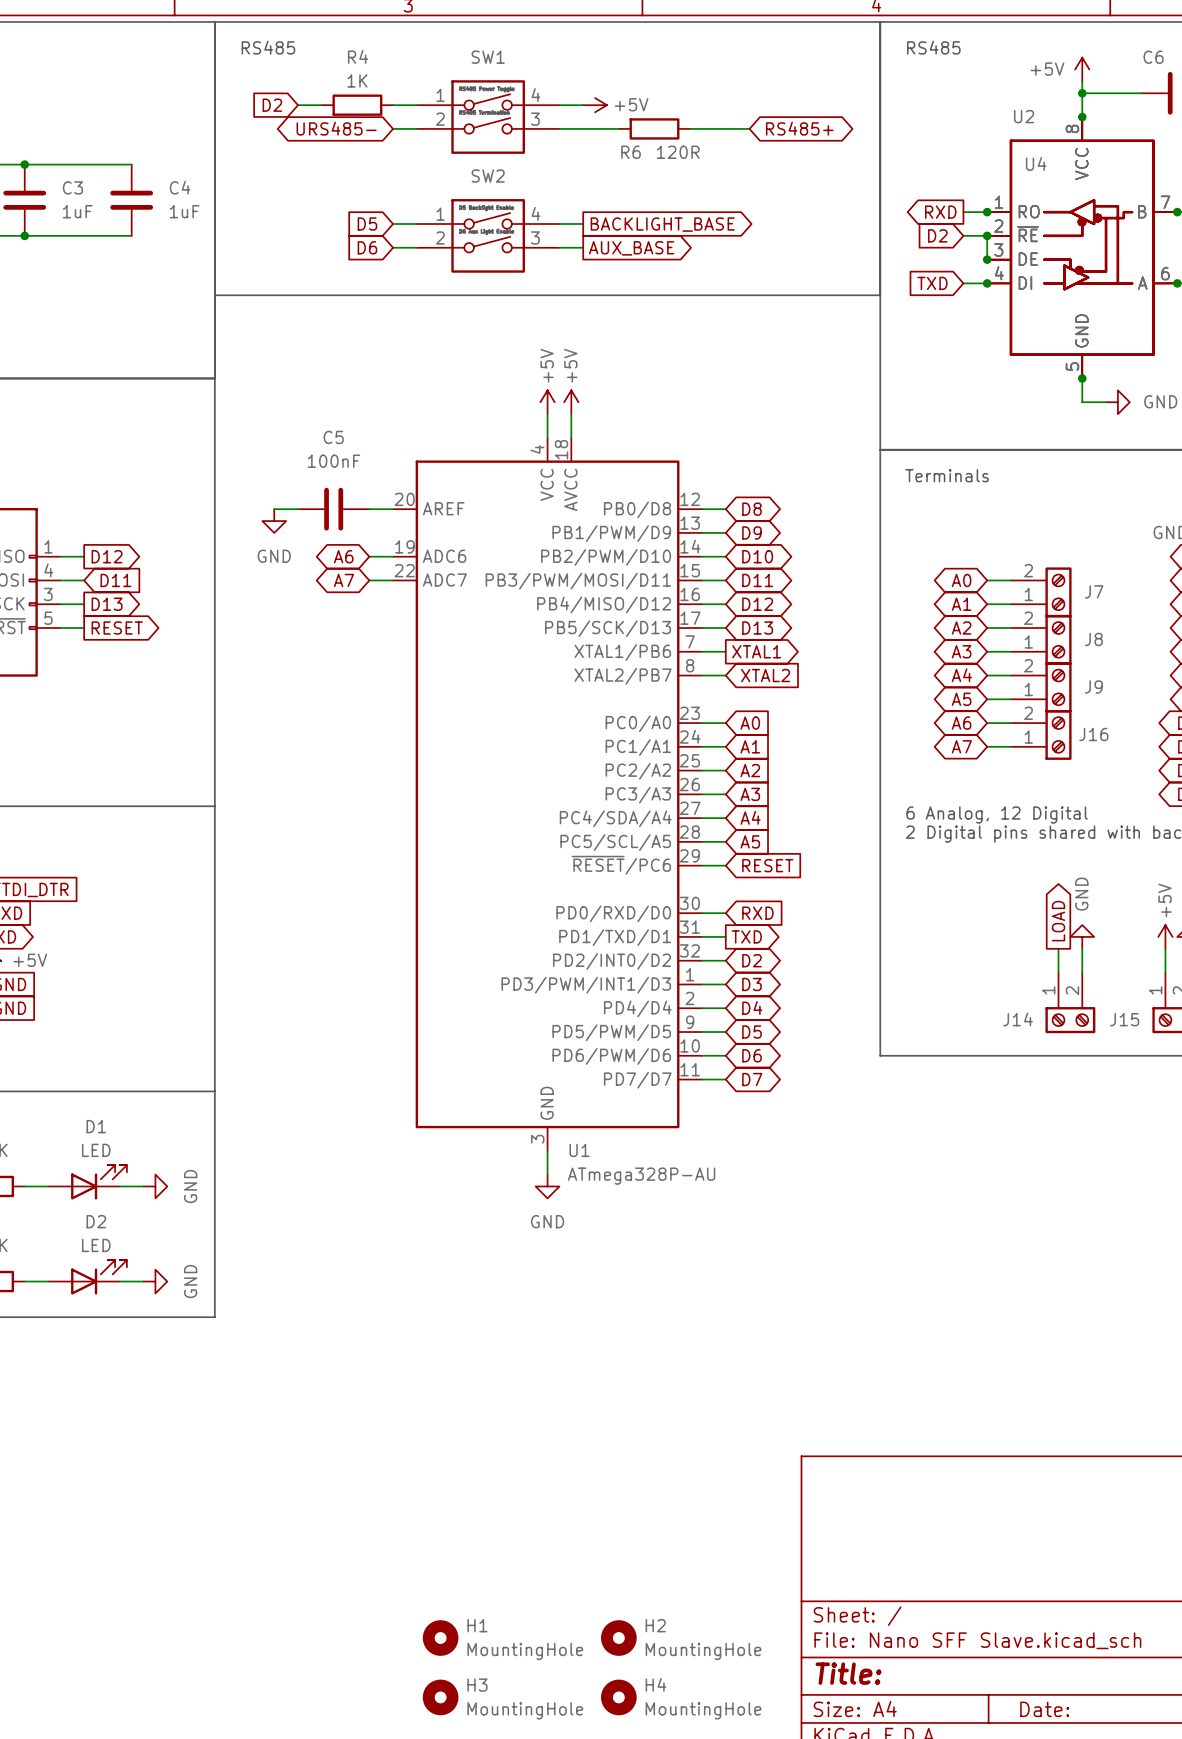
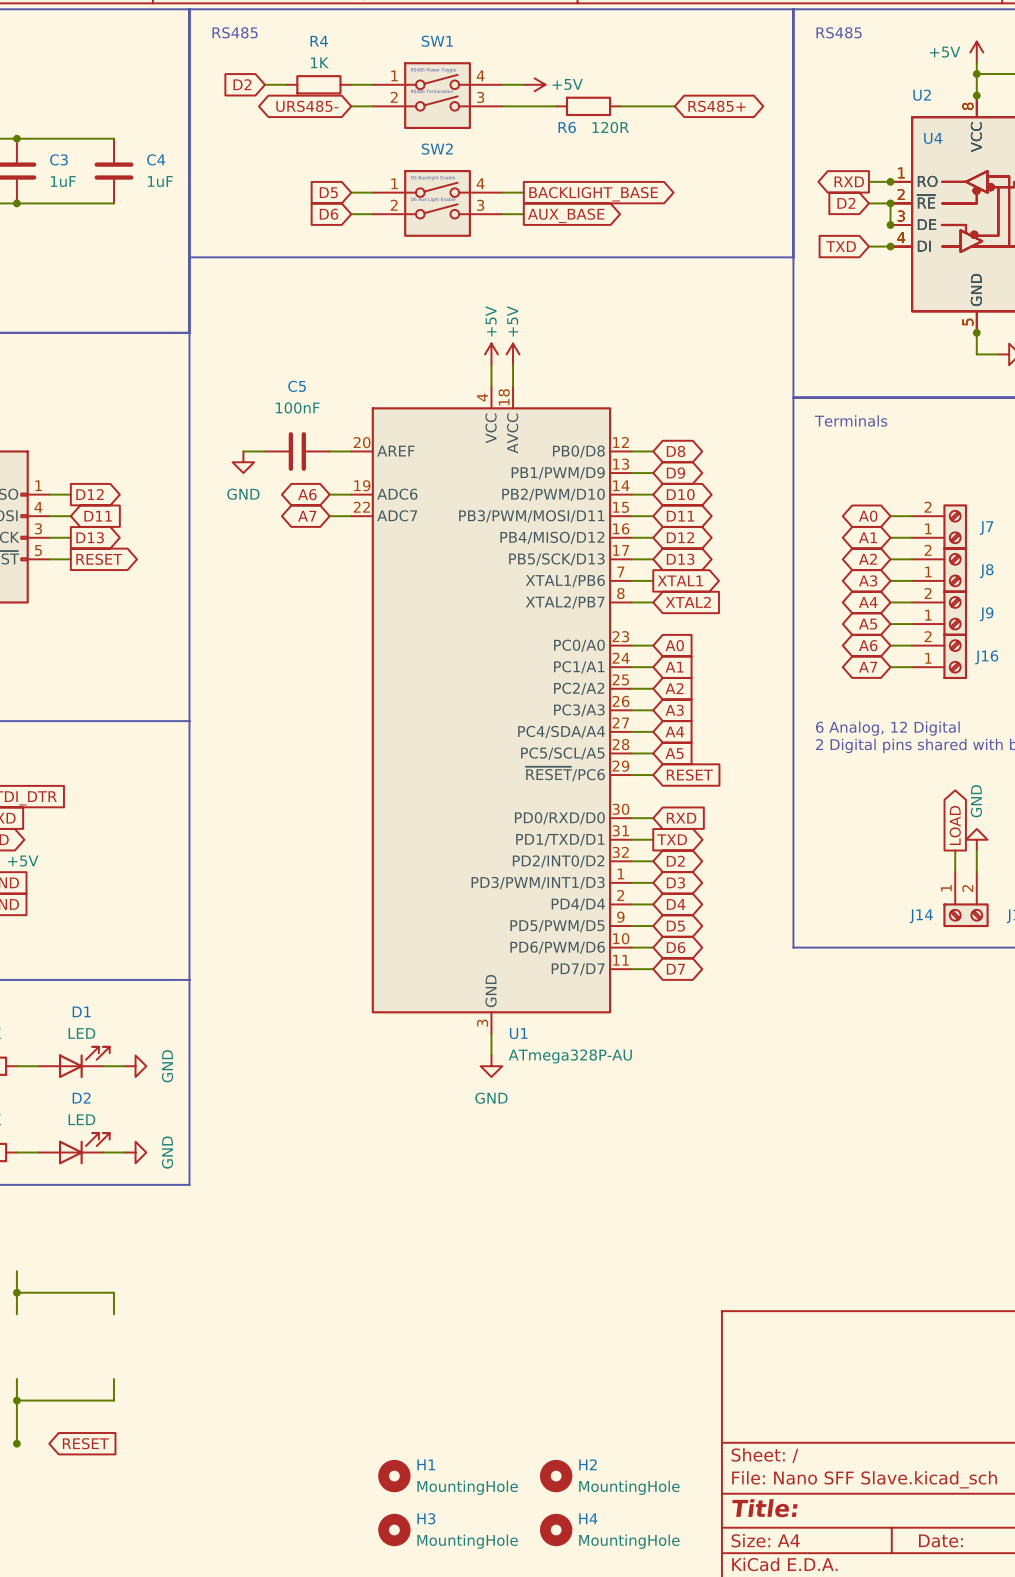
wire: none -> (16, 1271) (16, 1314)
wire: none -> (16, 1292) (113, 1292) (113, 1314)
junction: none -> (16, 1292)
wire: none -> (16, 1379) (16, 1443)
wire: none -> (113, 1379) (113, 1400) (16, 1400)
junction: none -> (16, 1400)
junction: none -> (16, 1443)
global label: none -> RESET (85, 1443)

